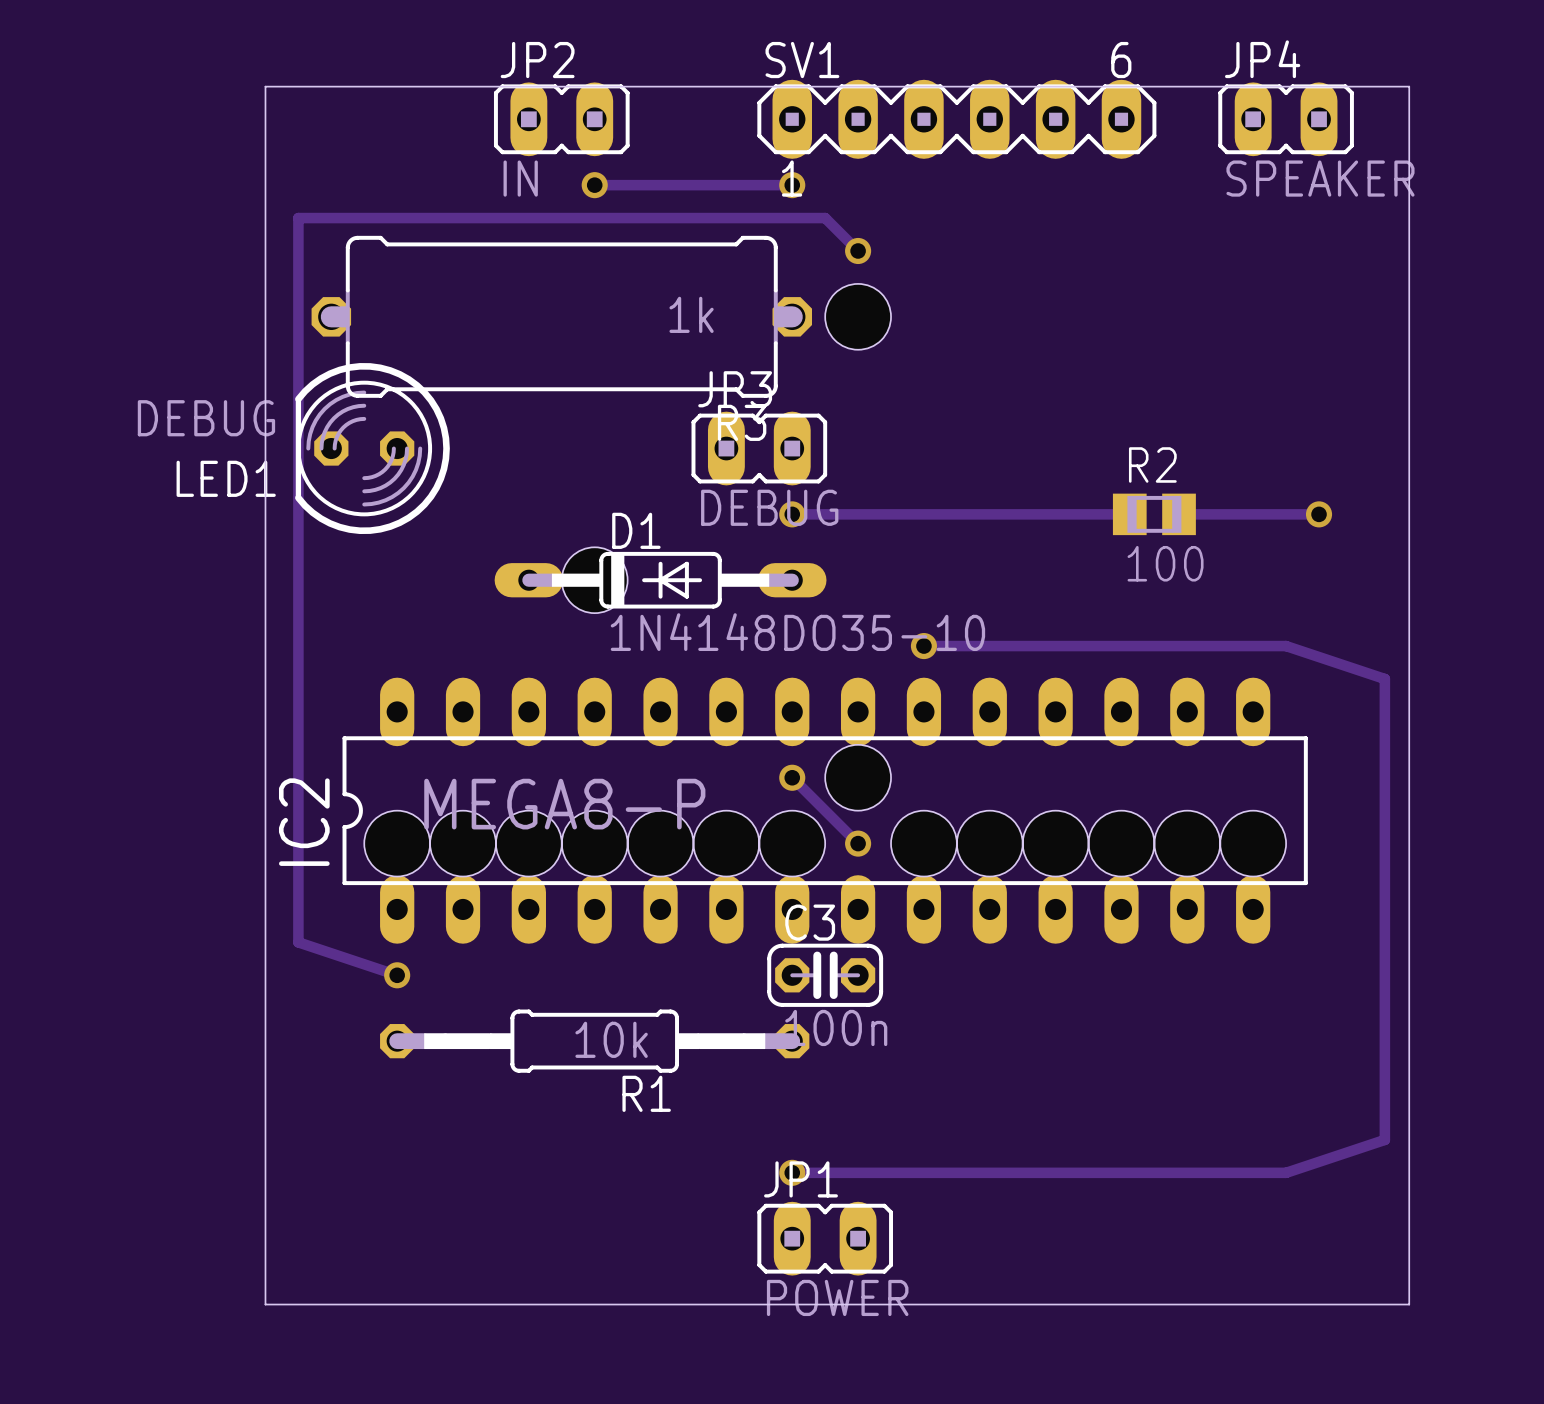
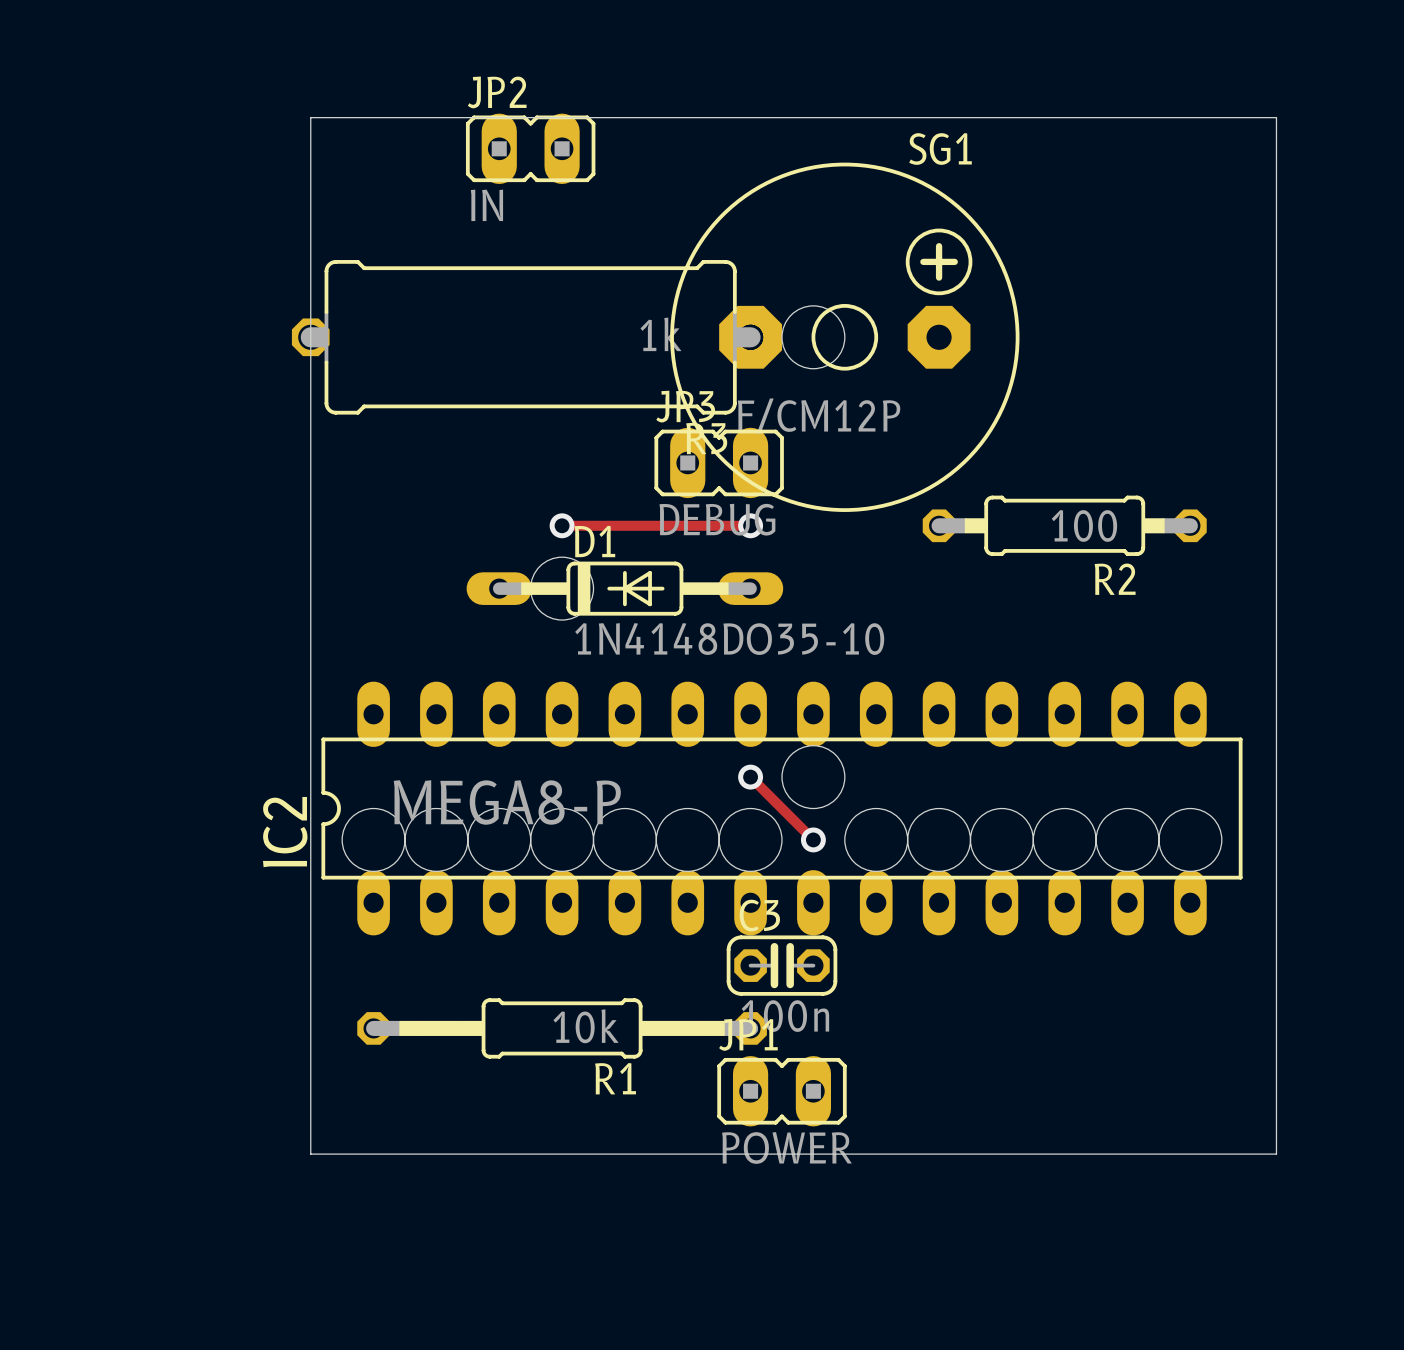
board edge: (331, 86) (265, 86) (265, 1304) (1409, 1304) (1409, 86) (1343, 86) -> (310, 117) (310, 1154) (1276, 1154) (1276, 117)
SV1: (956, 119) -> none
JP4: SPEAKER (1286, 119) -> none
track: (594, 185) (792, 185) -> none
via: (594, 185) -> none
via: (792, 185) -> none
track: (858, 250) (825, 218) (298, 218) (298, 942) (397, 975) -> none
via: (858, 250) -> none
SG1: none -> F/CM12P (844, 337)
LED1: DEBUG (372, 448) -> none
R2 name position: R2 (1152, 464) -> R2 (1115, 579)
R2 footprint: [1112, 493, 1196, 536] -> [922, 495, 1207, 556]
via: none -> (562, 525)
track: (792, 514) (1129, 514) -> (750, 525) (562, 525)
track: (1179, 514) (1319, 514) -> none
via: (1319, 514) -> none
track: (923, 646) (1286, 646) (1384, 678) (1384, 1139) (1286, 1172) (792, 1172) -> none
via: (923, 646) -> none
via: (397, 975) -> none
via: (792, 1172) -> none
JP1 position: (825, 1238) -> (781, 1091)

